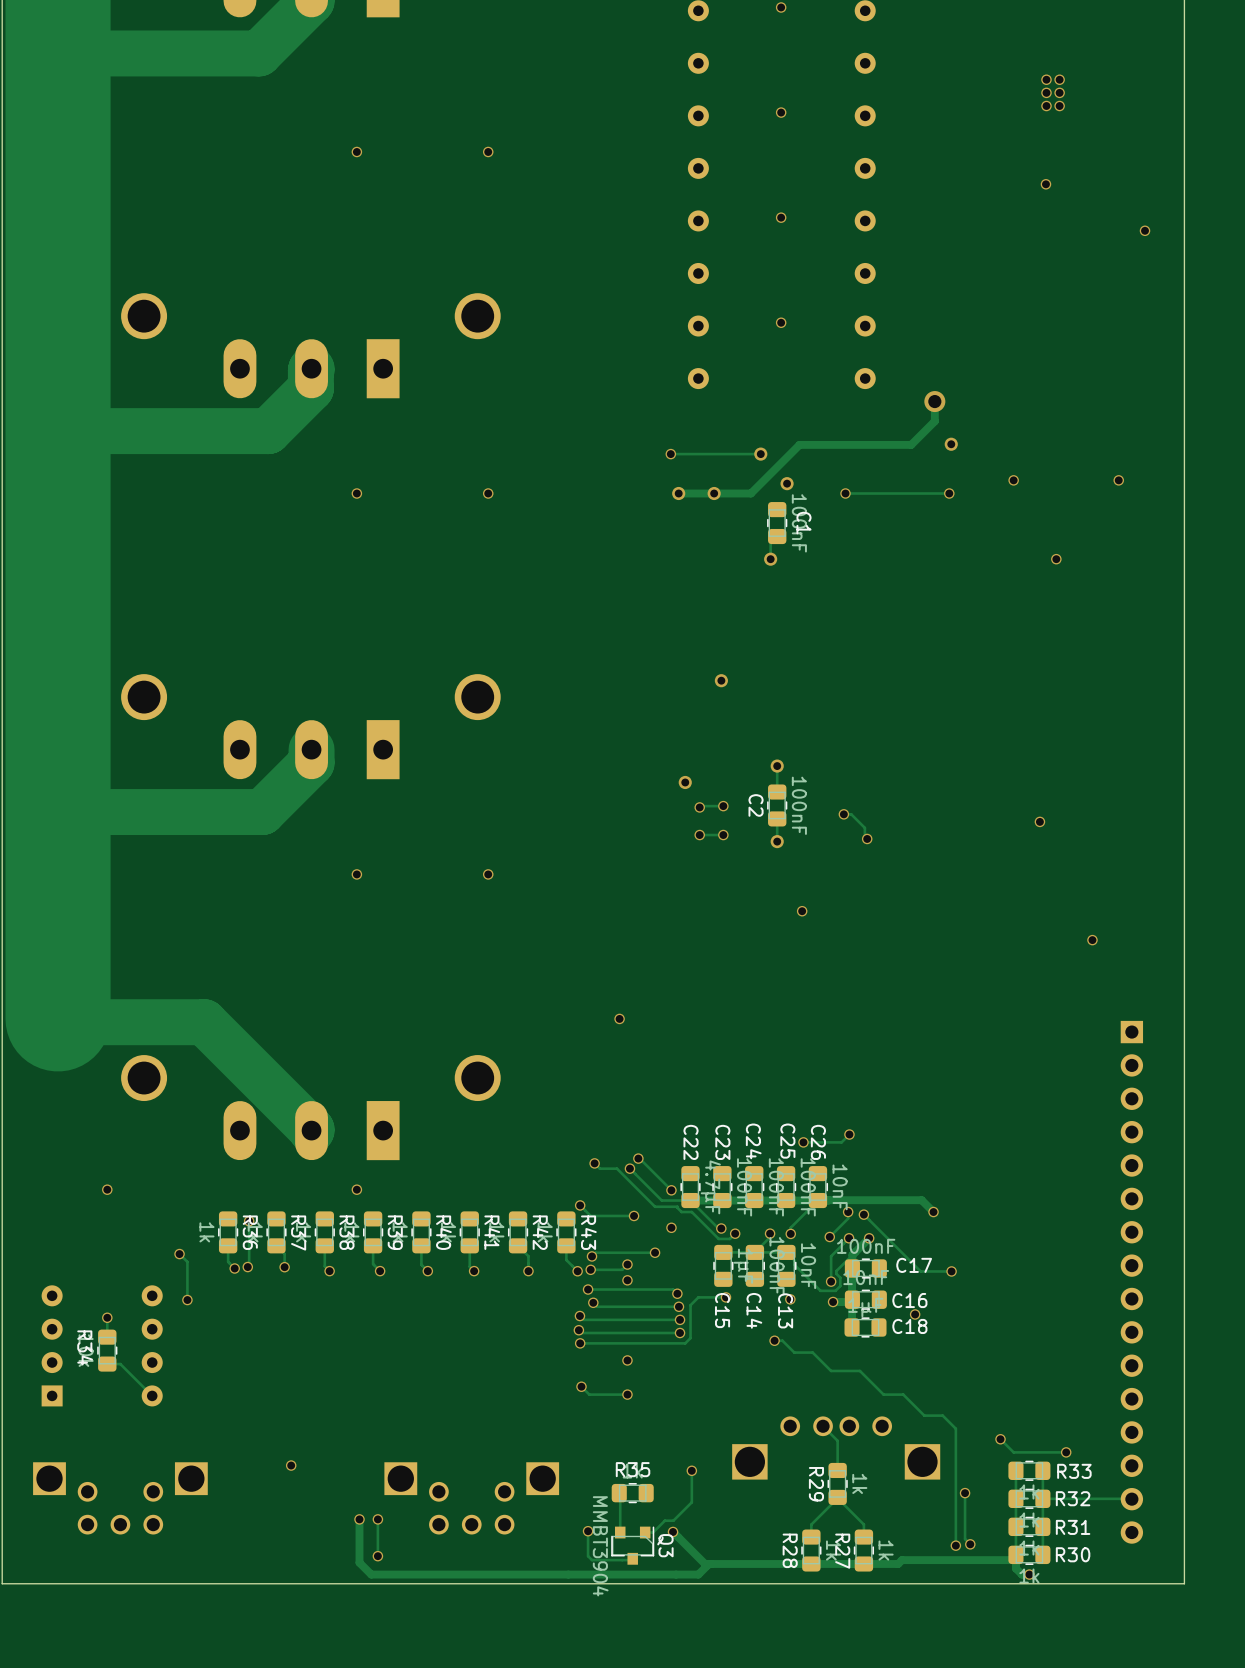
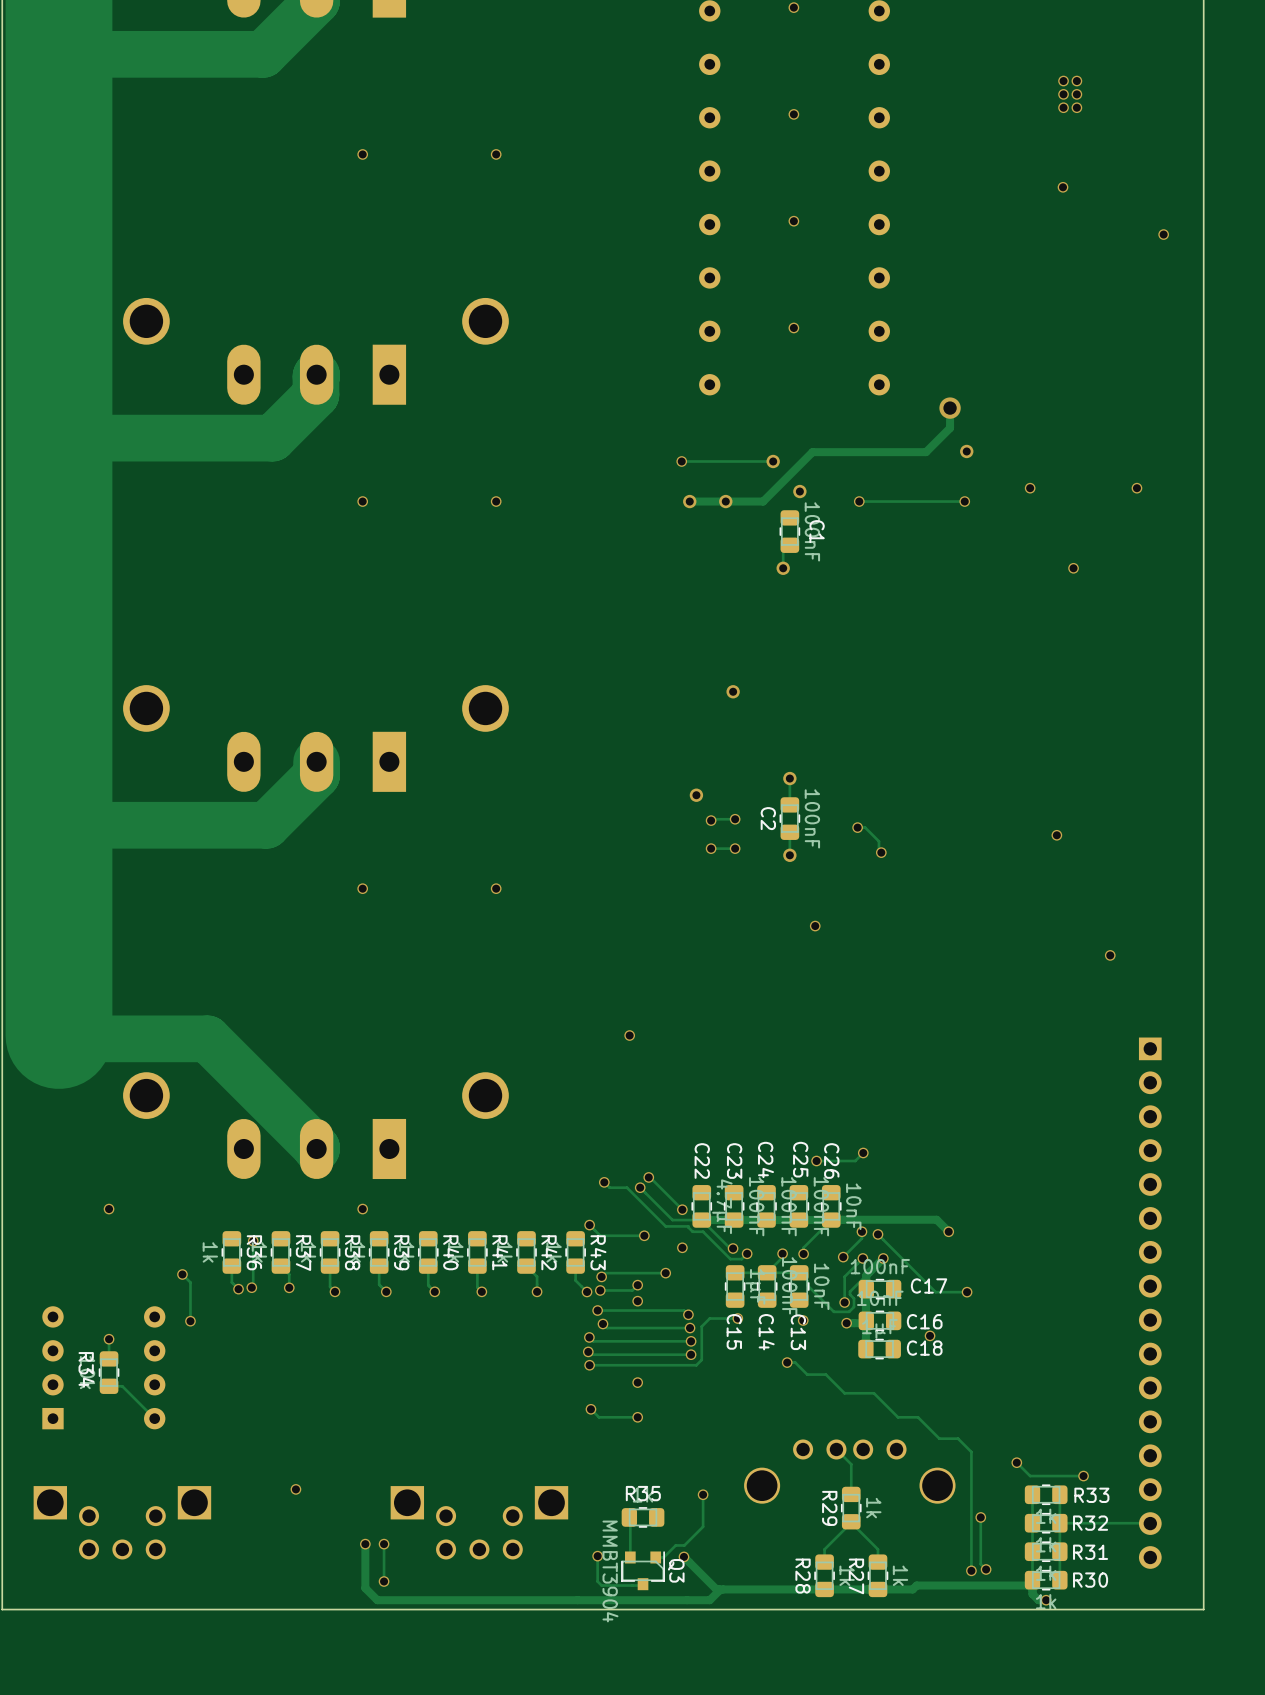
part footprint: [732, 1416, 941, 1480] -> [744, 1439, 956, 1504]

